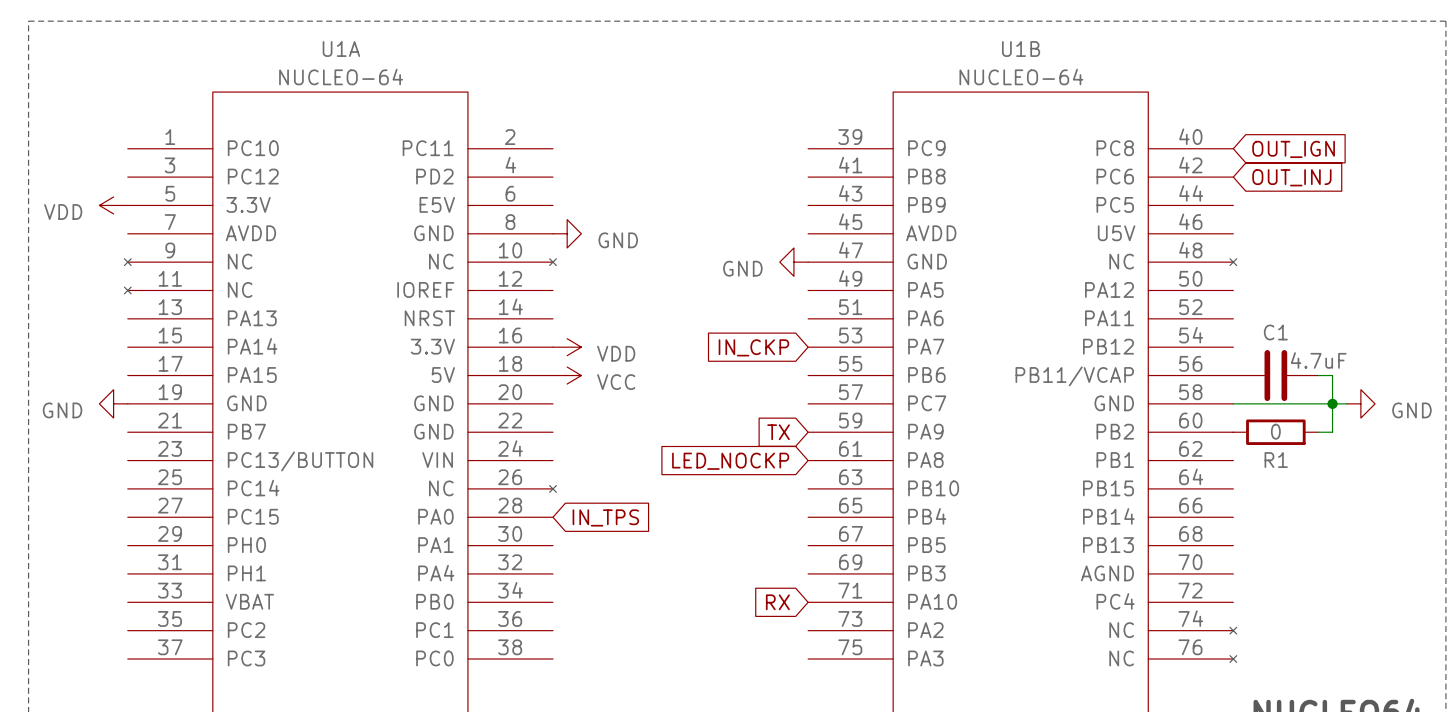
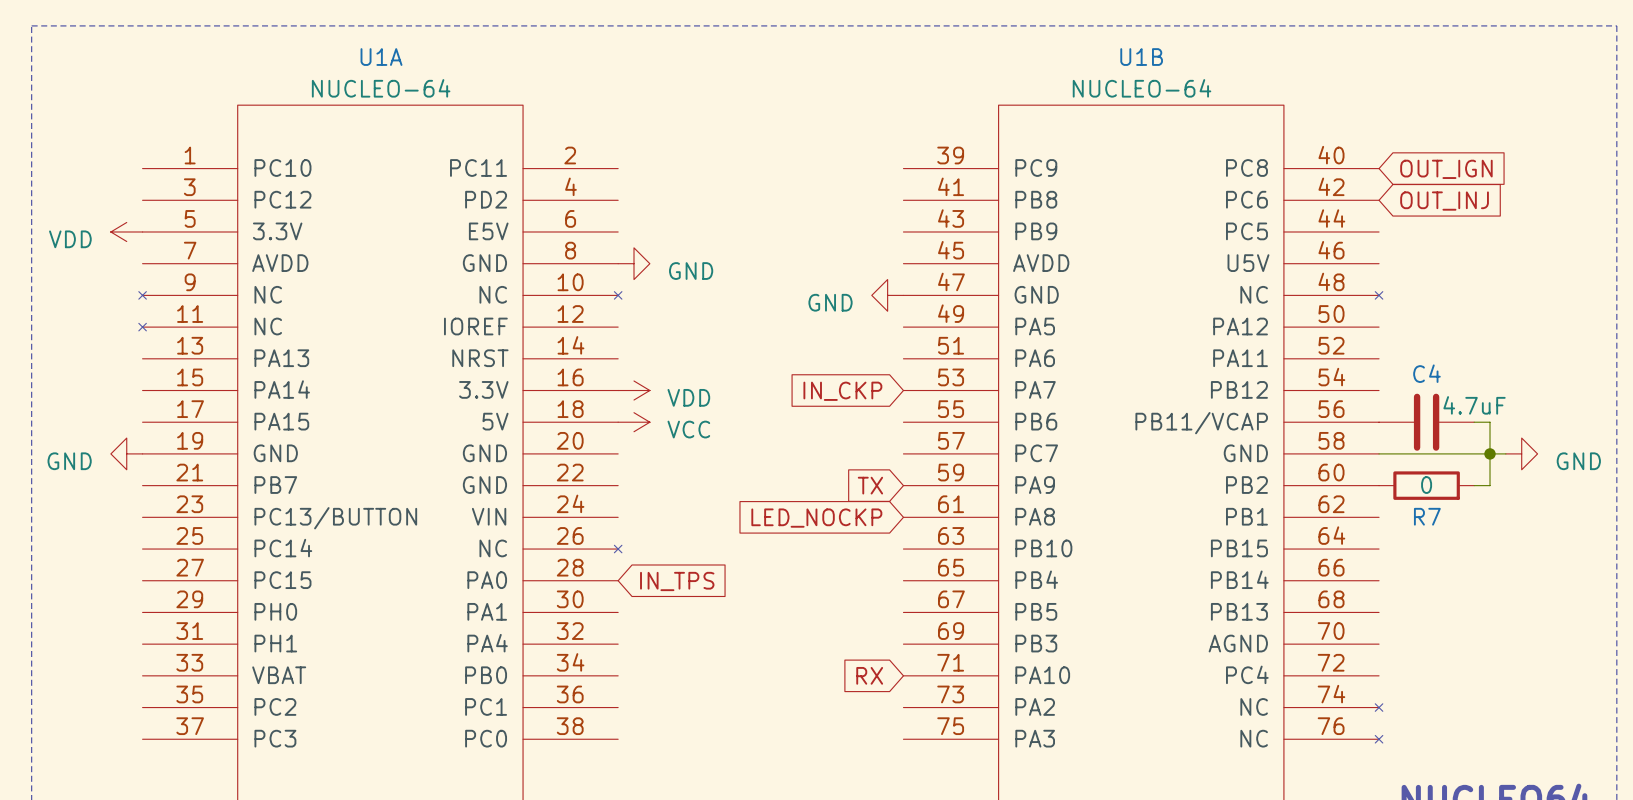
C1 name: C1 (1275, 332) -> C4 (1426, 373)
R1 name: R1 (1276, 460) -> R7 (1427, 516)

